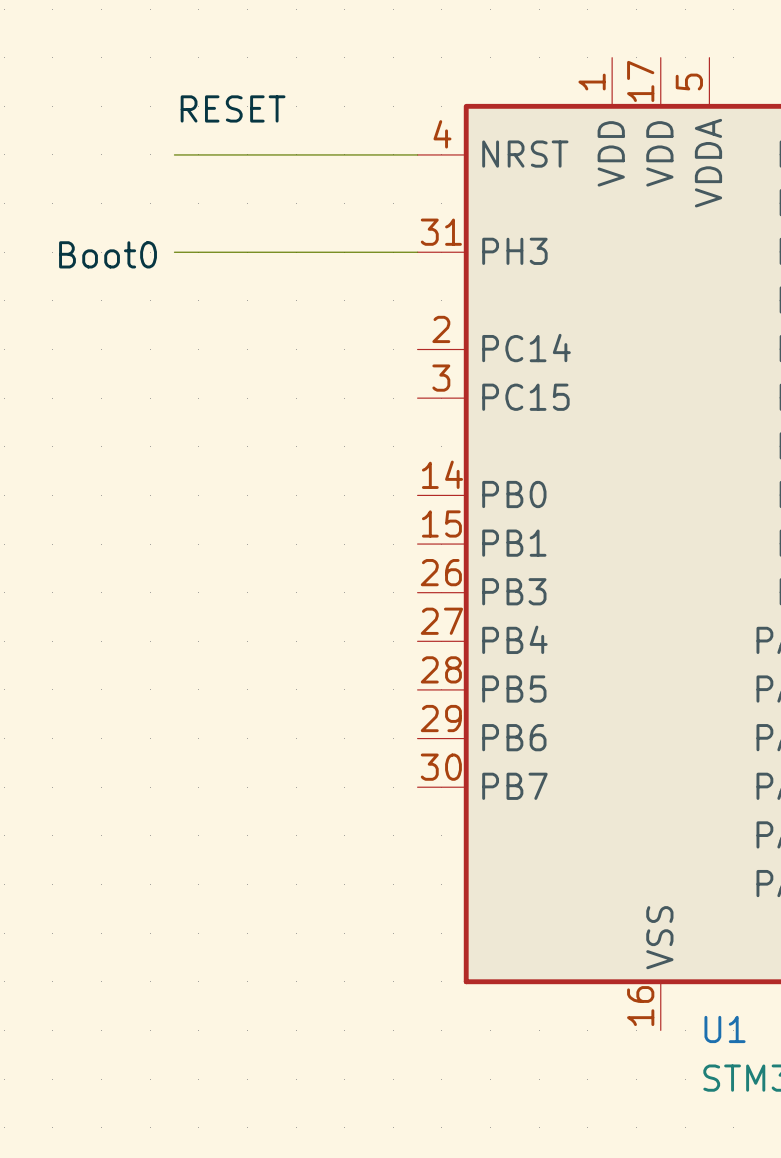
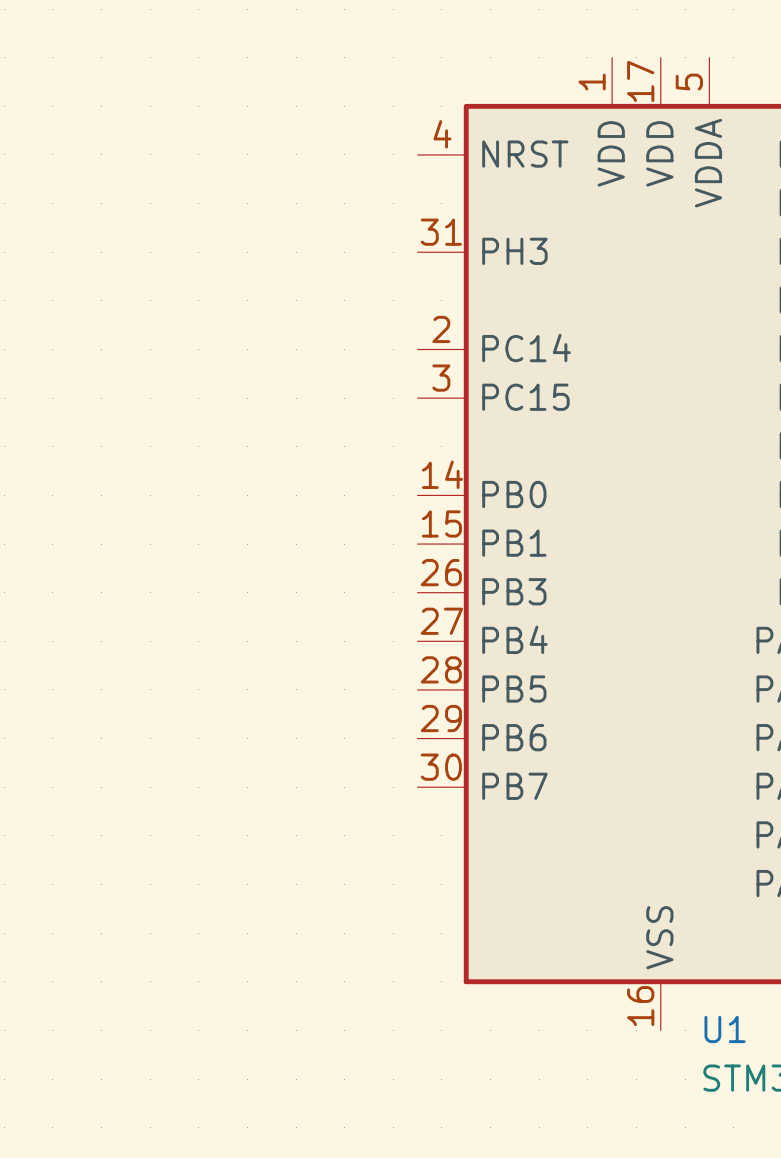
label: RESET (233, 108) -> none
wire: (174, 154) (417, 154) -> none
wire: (174, 252) (417, 252) -> none
label: Boot0 (108, 254) -> none

